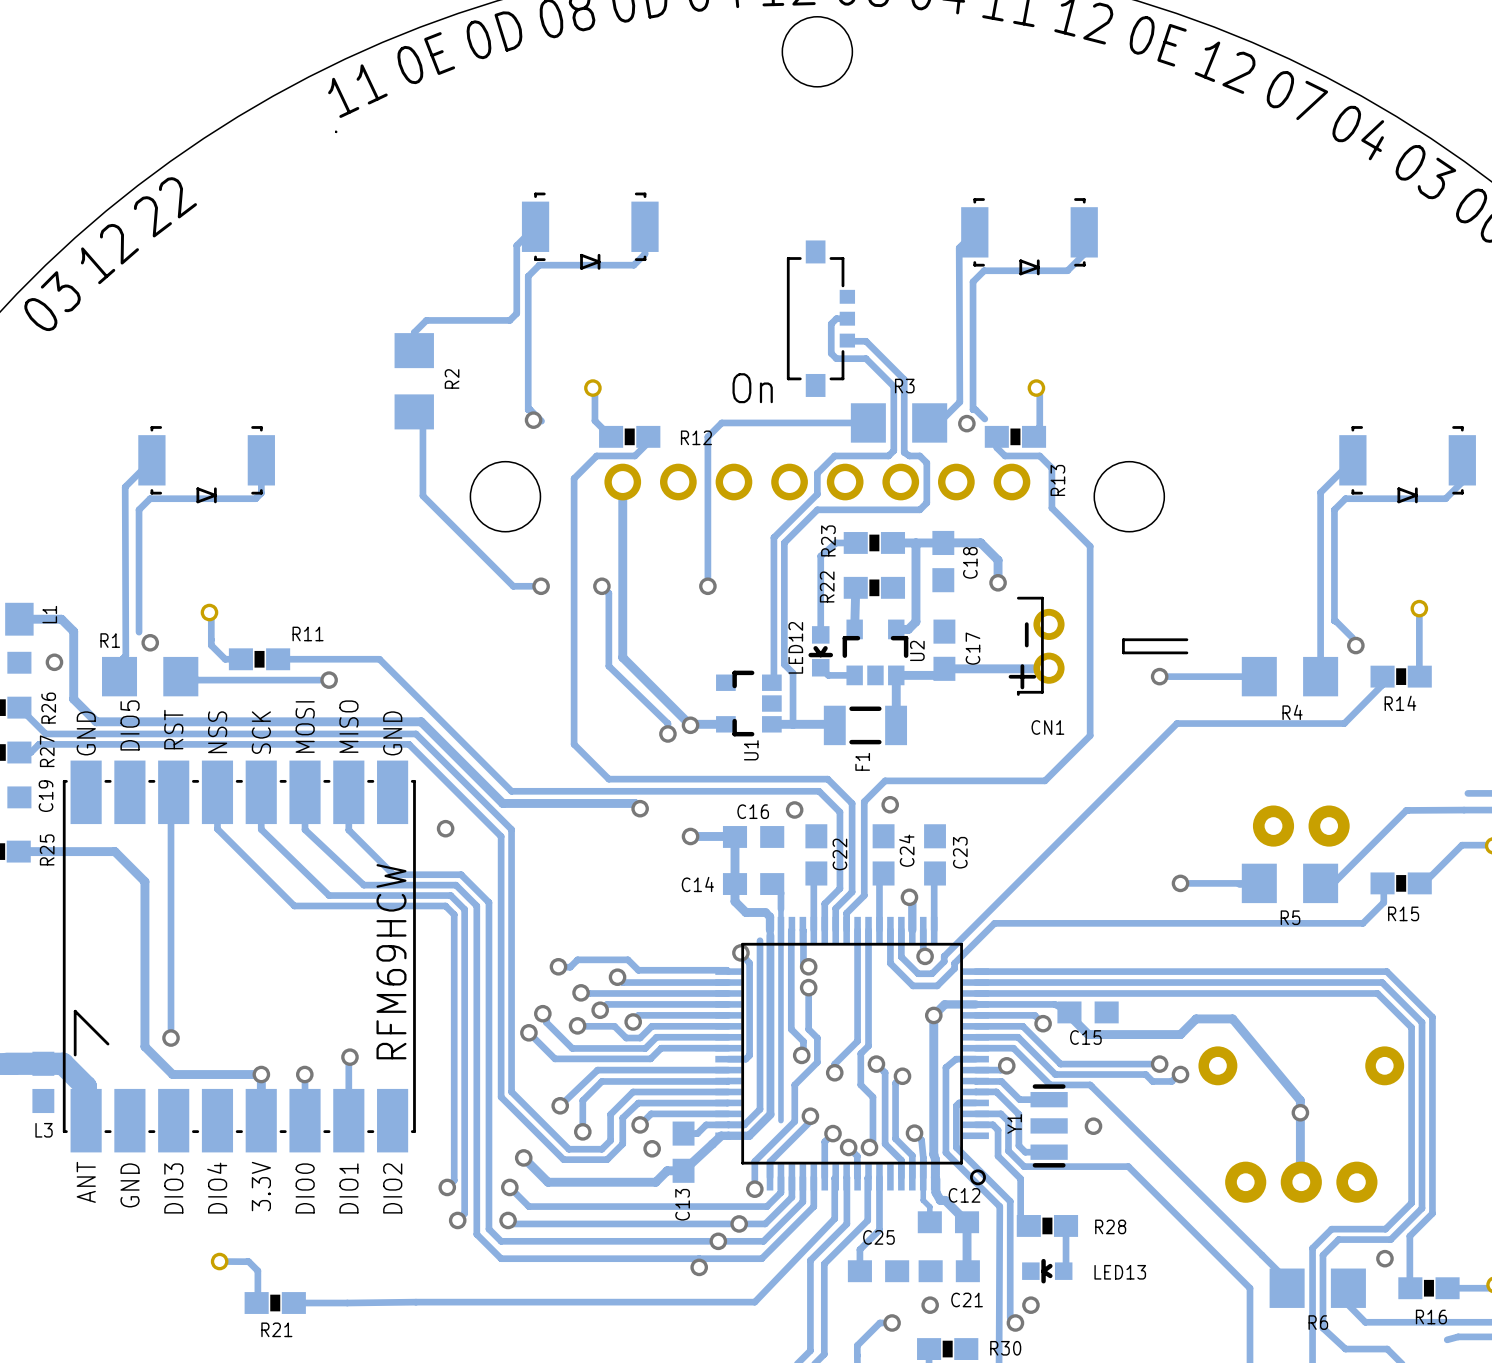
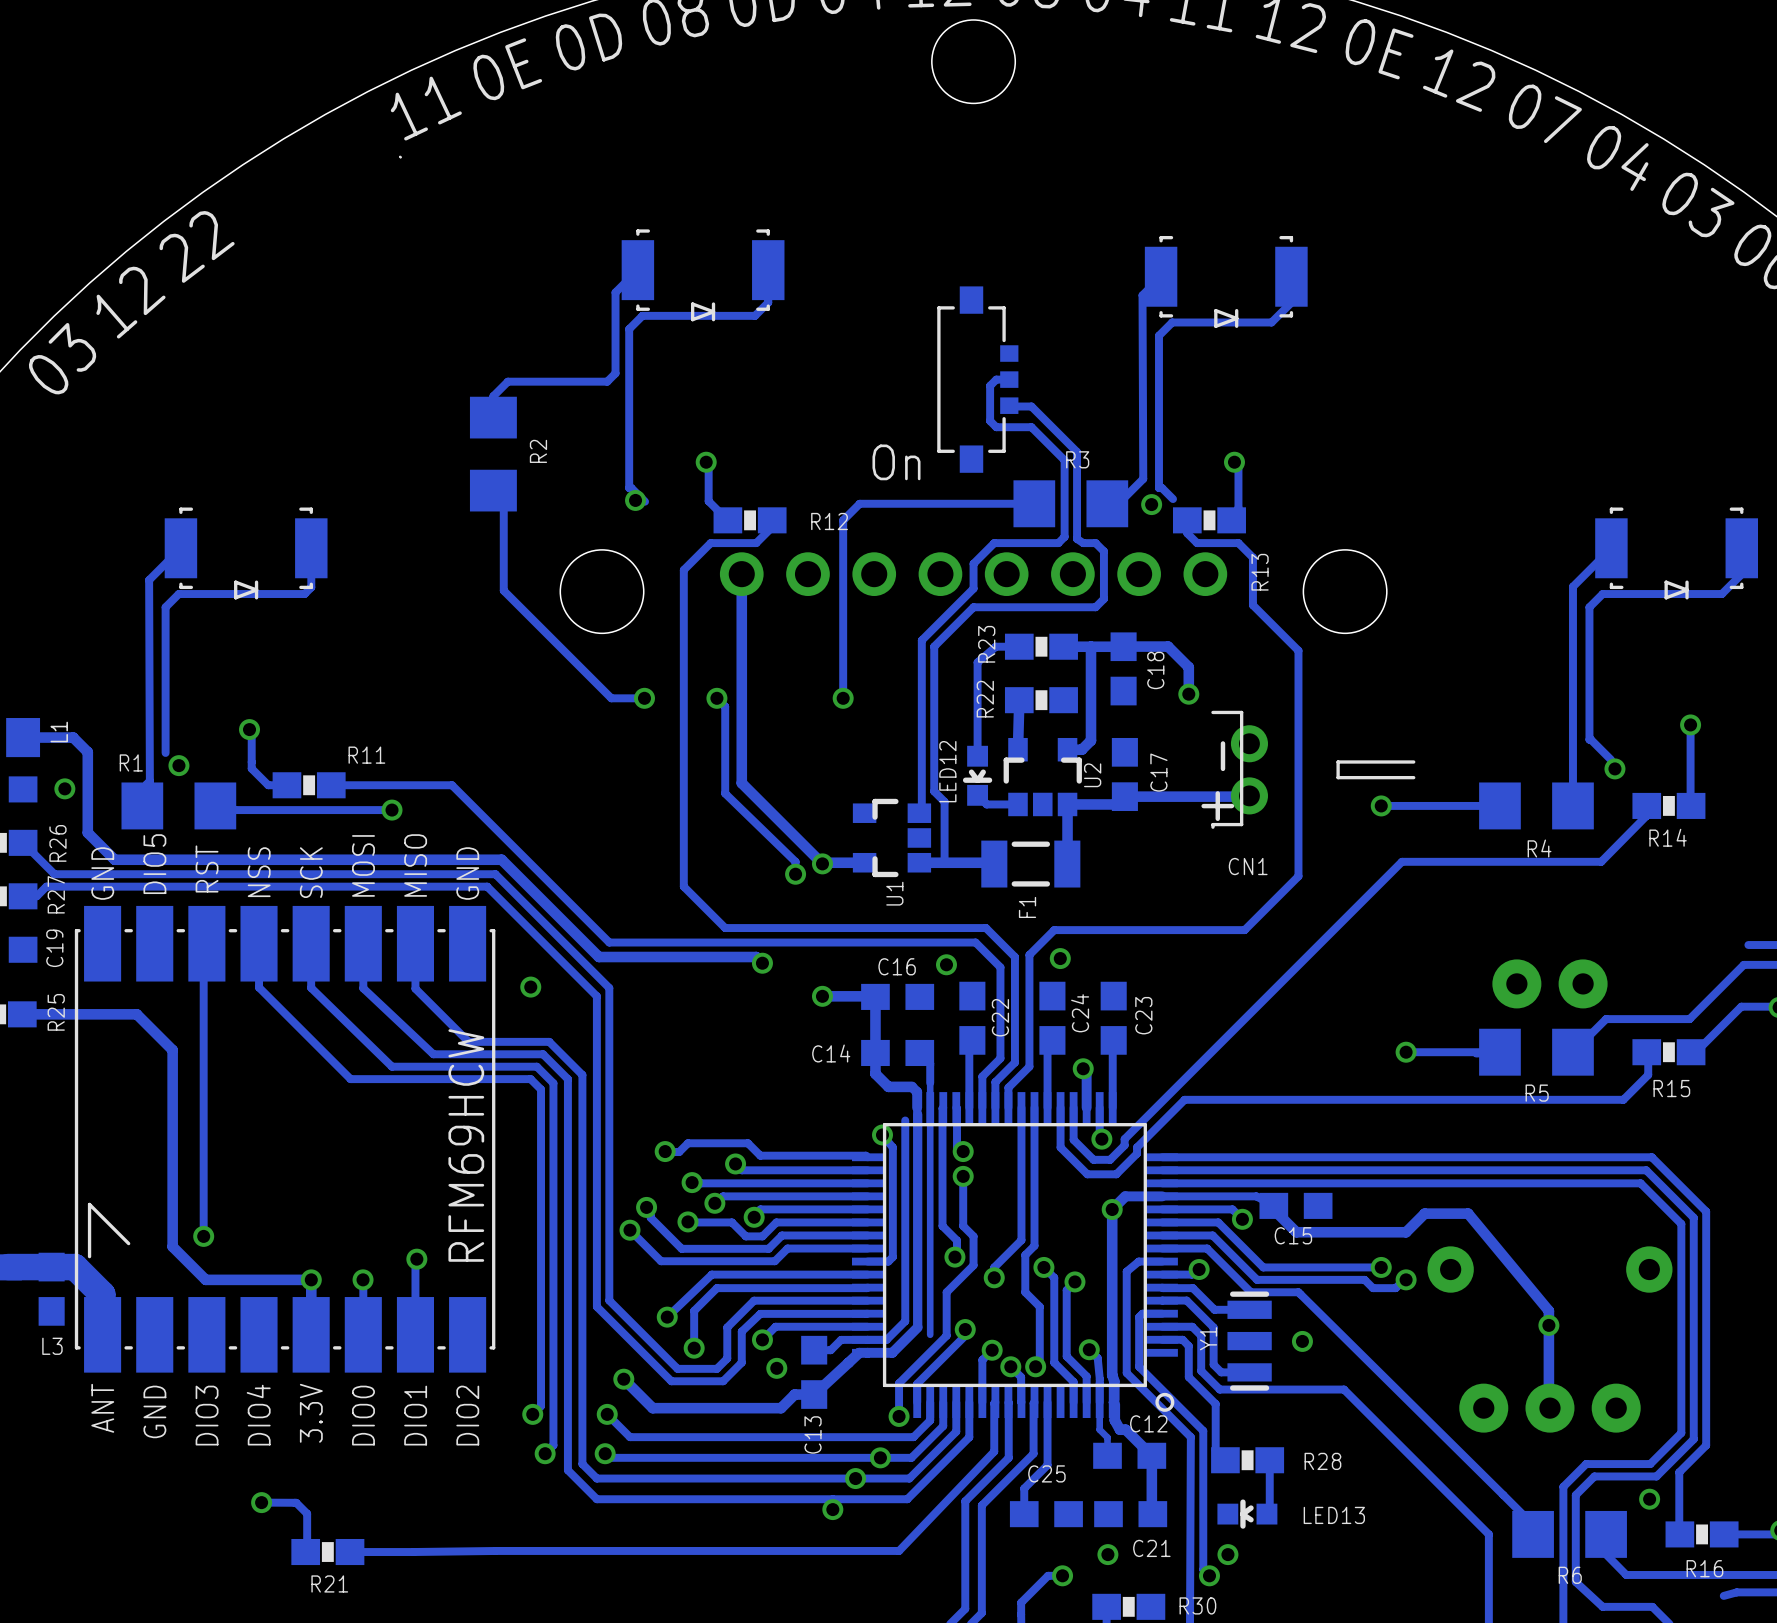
track: (1464, 810) (1406, 810) (1335, 881) (1322, 881) -> (1743, 964) (1689, 1019) (1606, 1019) (1575, 1050)

